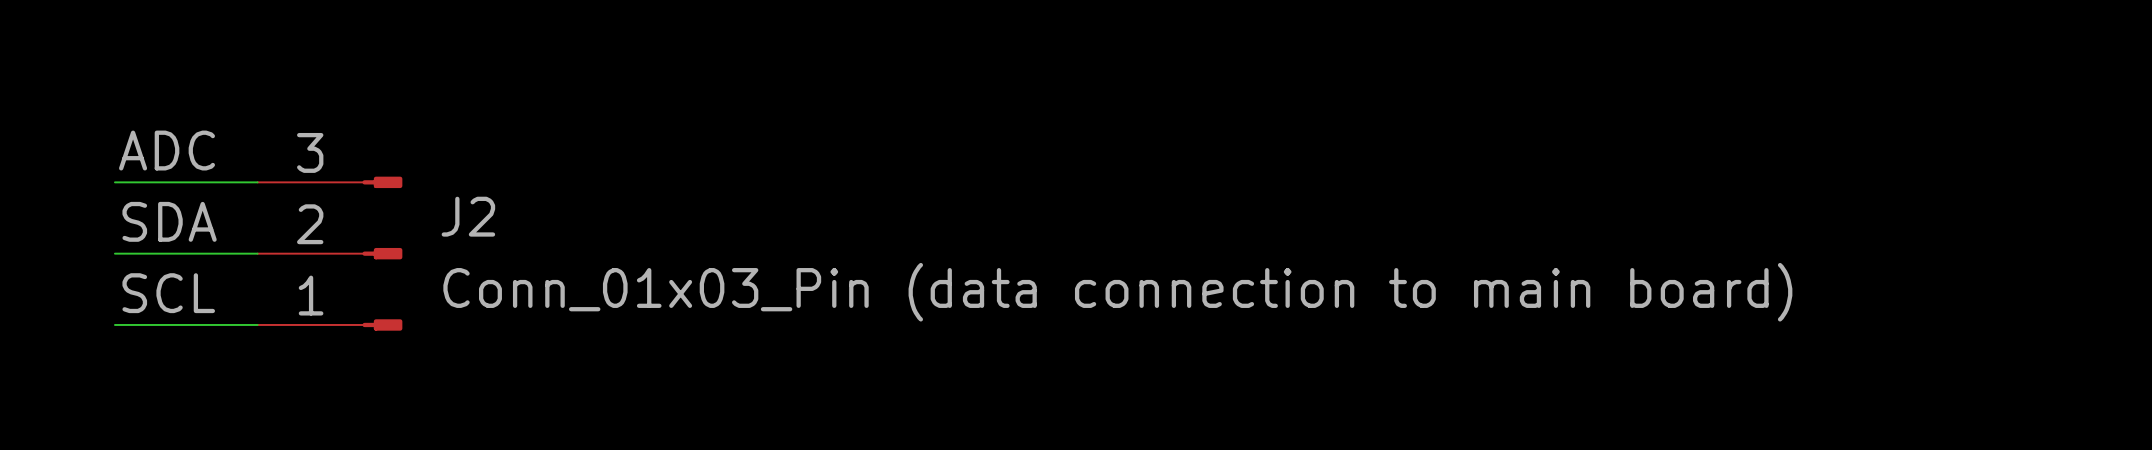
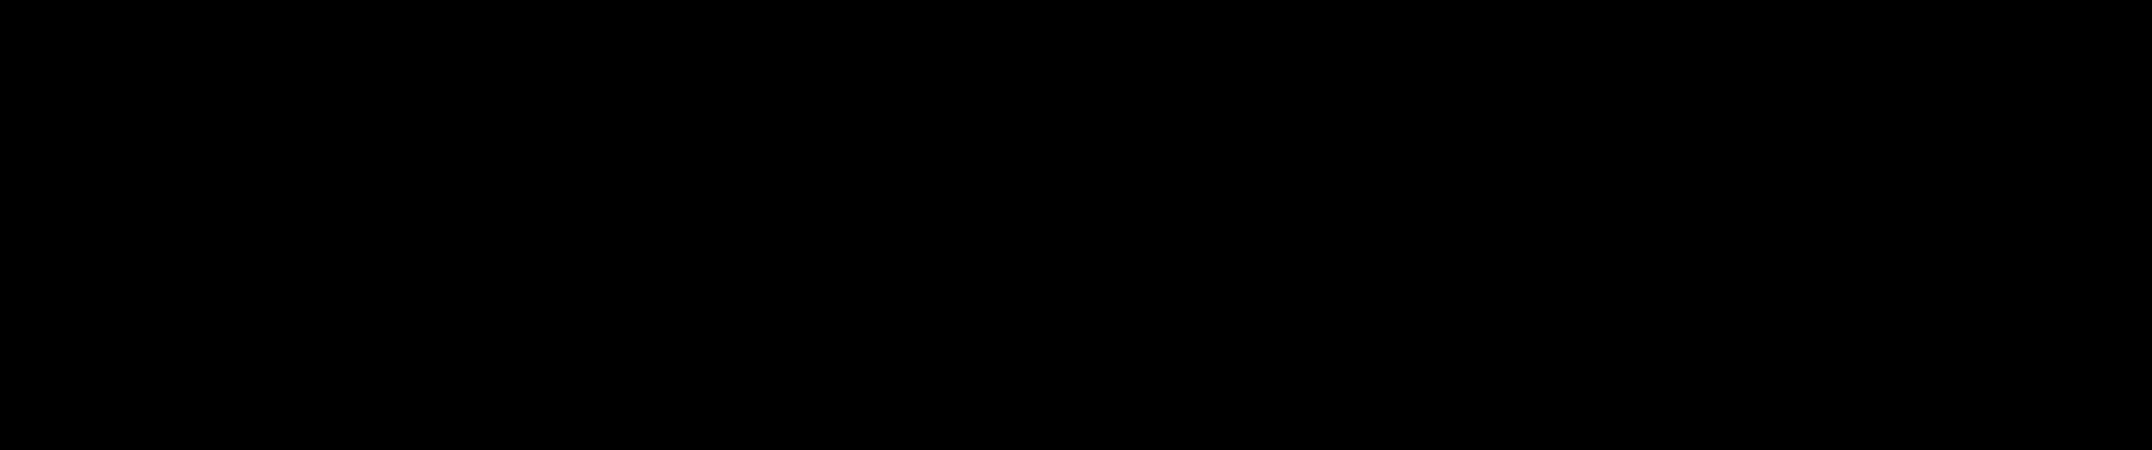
label: ADC (167, 150) -> none
wire: (114, 182) (257, 182) -> none
label: SDA (169, 221) -> none
wire: (114, 253) (257, 253) -> none
J2: Conn_01x03_Pin (data connection to main board) (329, 253) -> none
label: SCL (168, 293) -> none
wire: (114, 324) (257, 324) -> none

